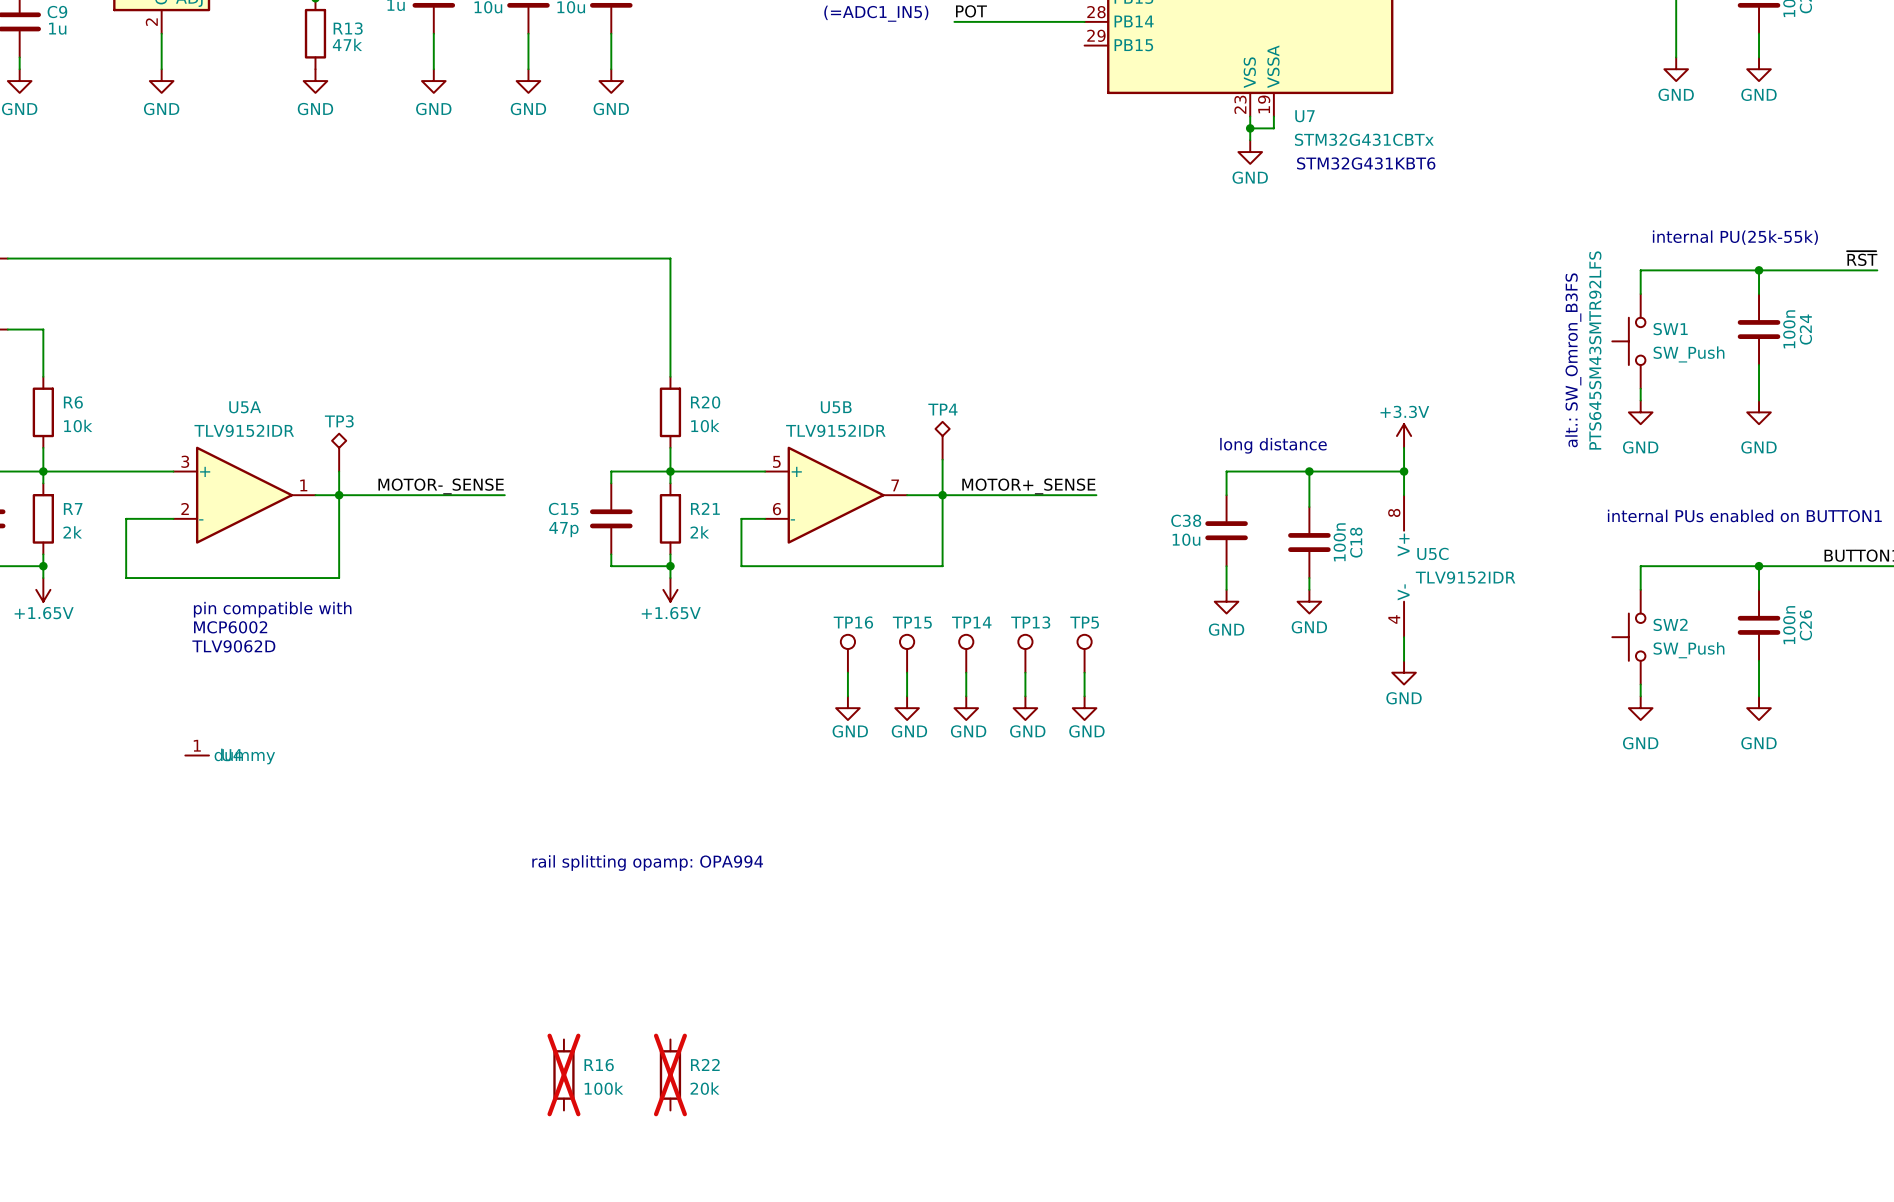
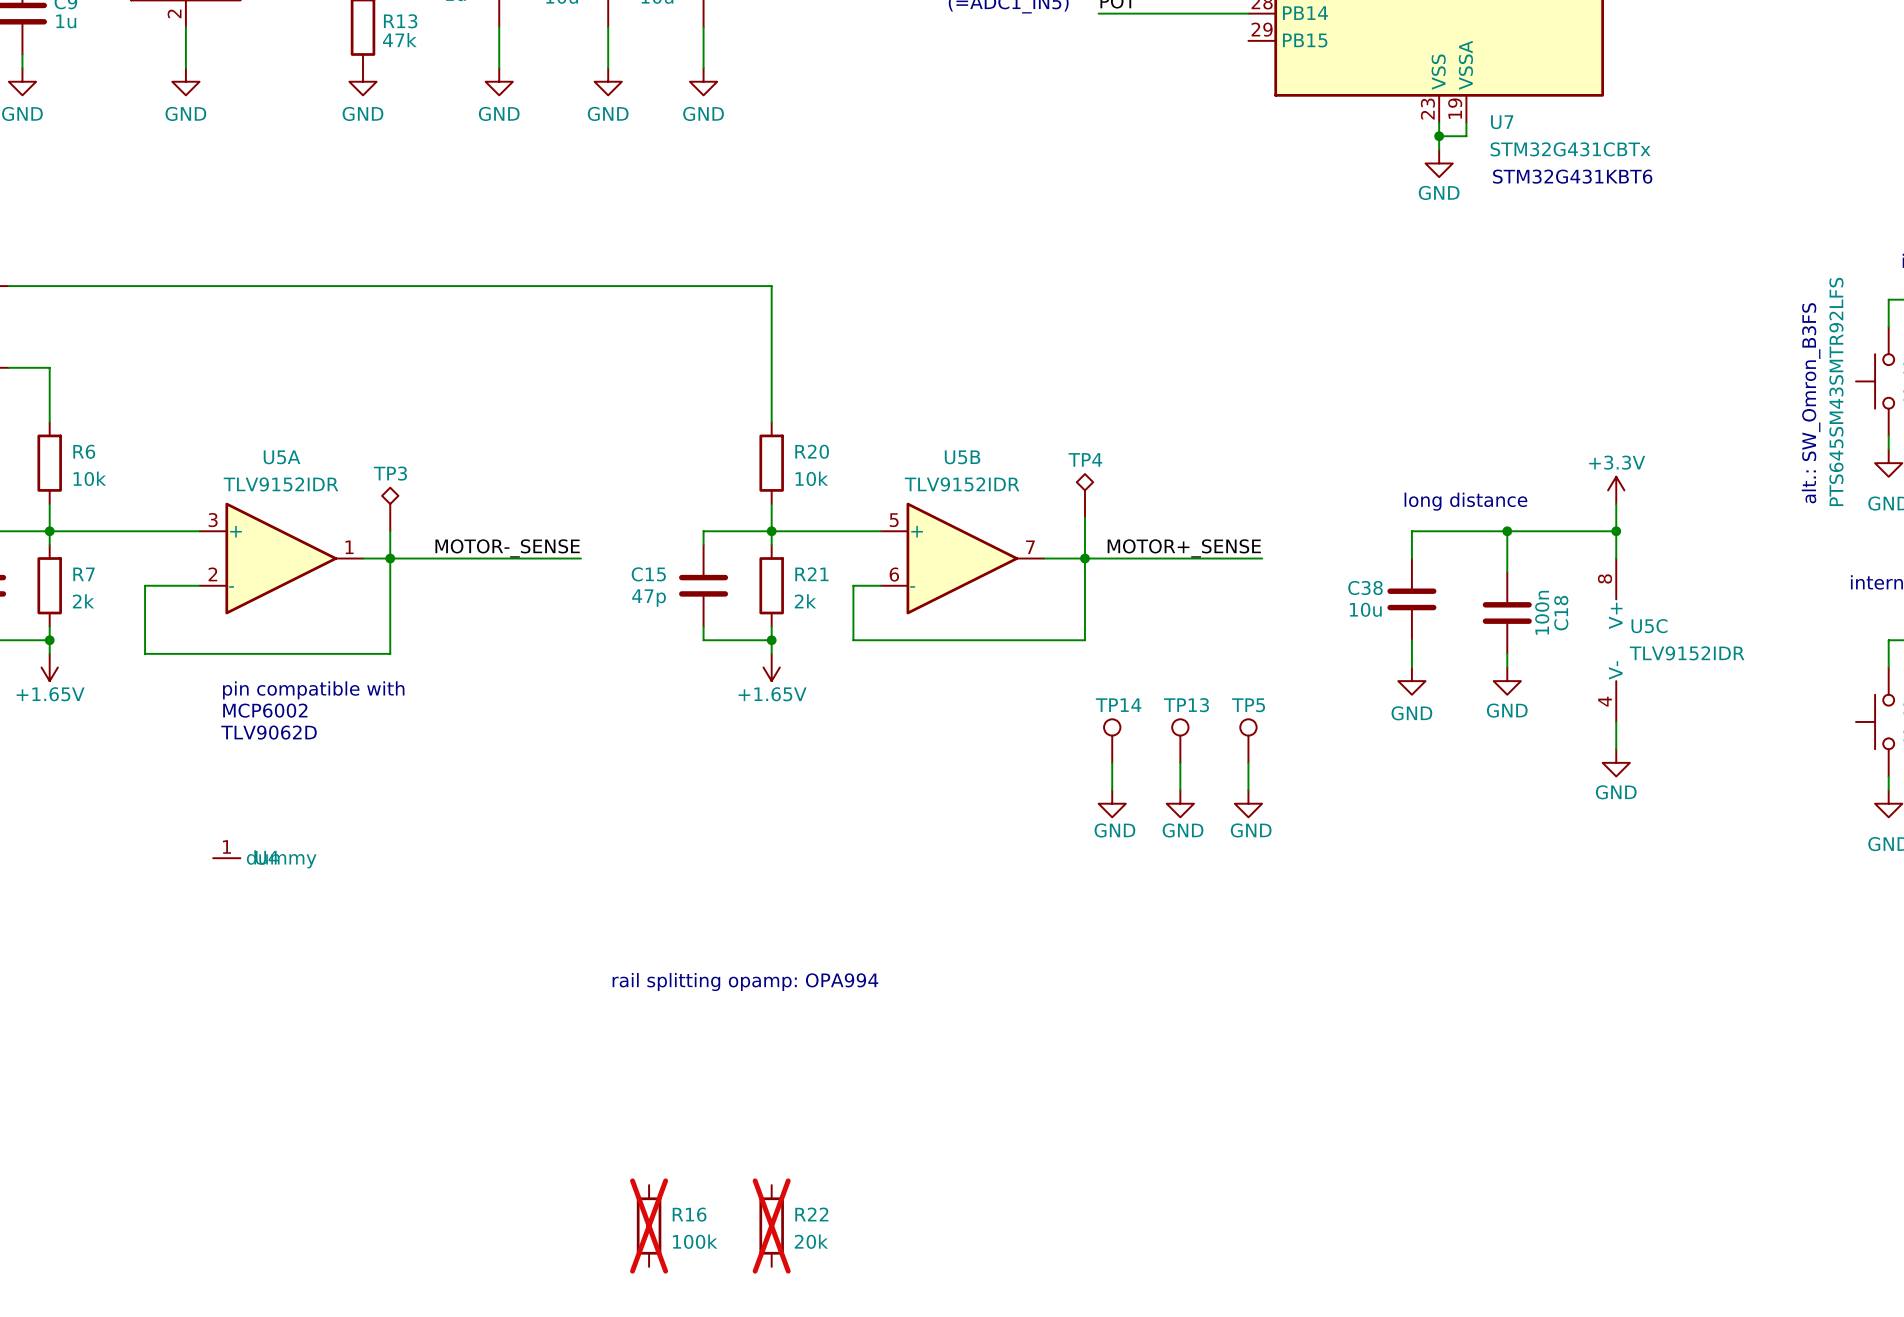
TP16: (847, 653) -> none
TP15: (907, 653) -> none
wire: (847, 672) (847, 696) -> none
wire: (907, 672) (907, 696) -> none
power symbol: GND (847, 708) -> none
power symbol: GND (907, 708) -> none

